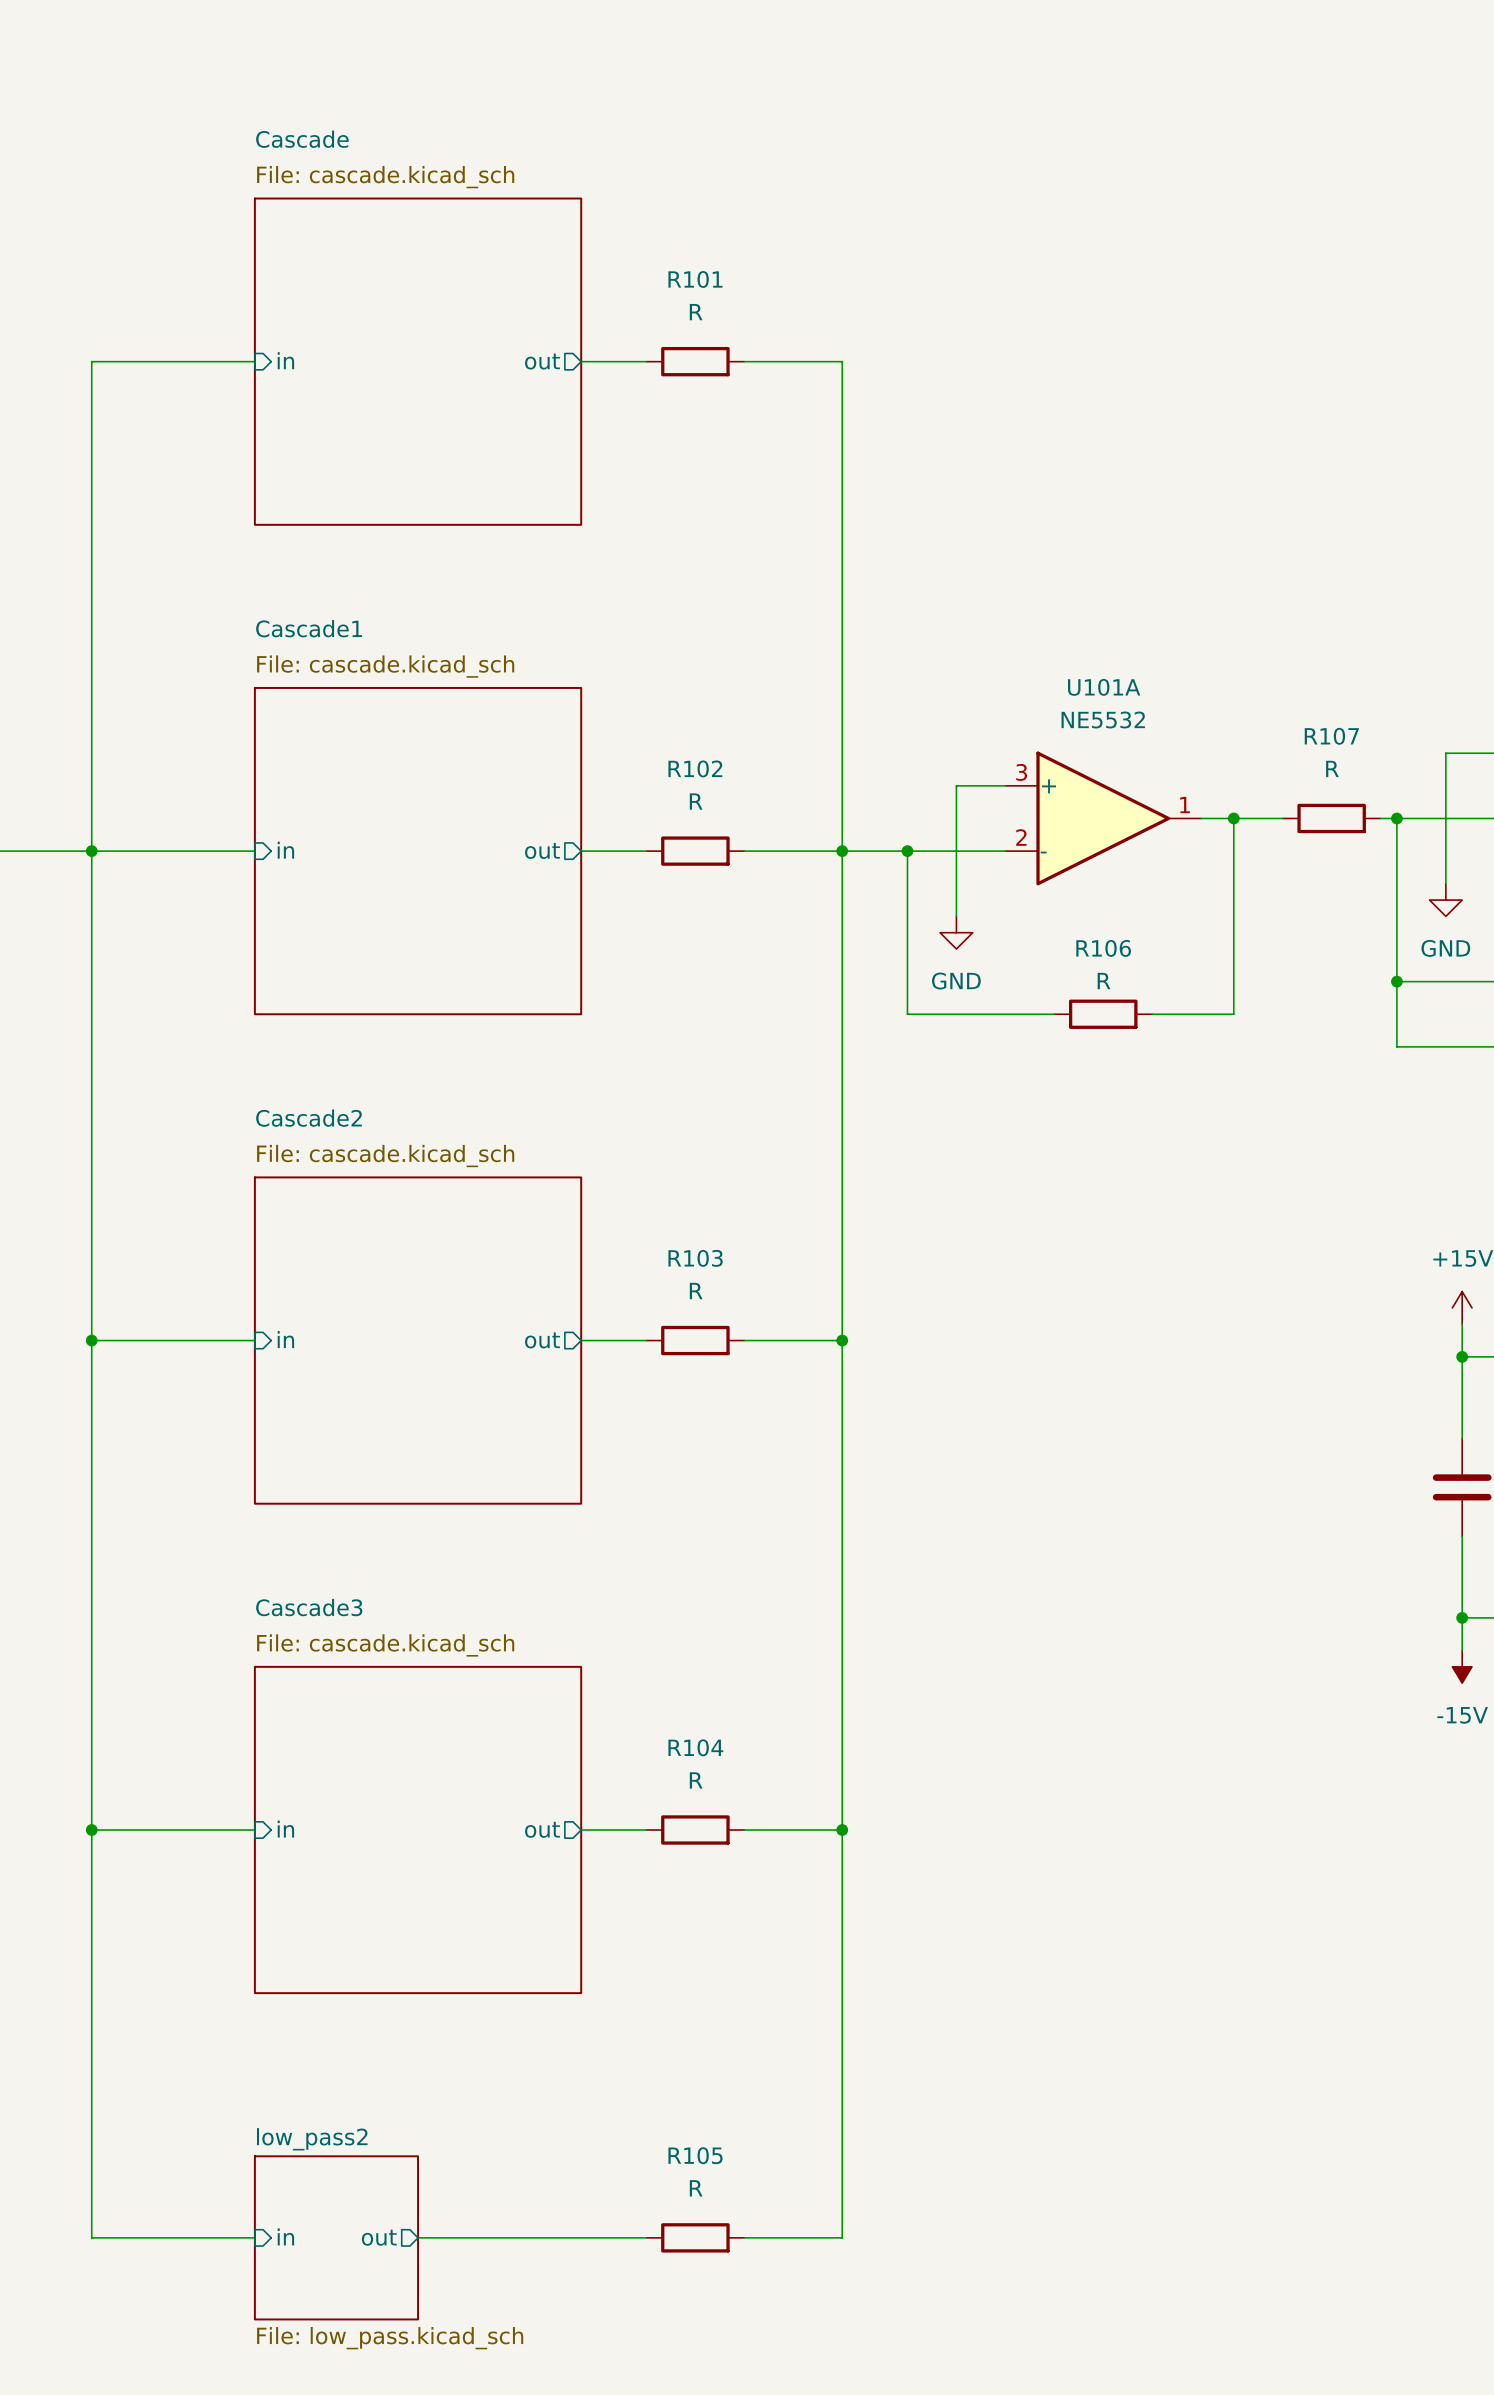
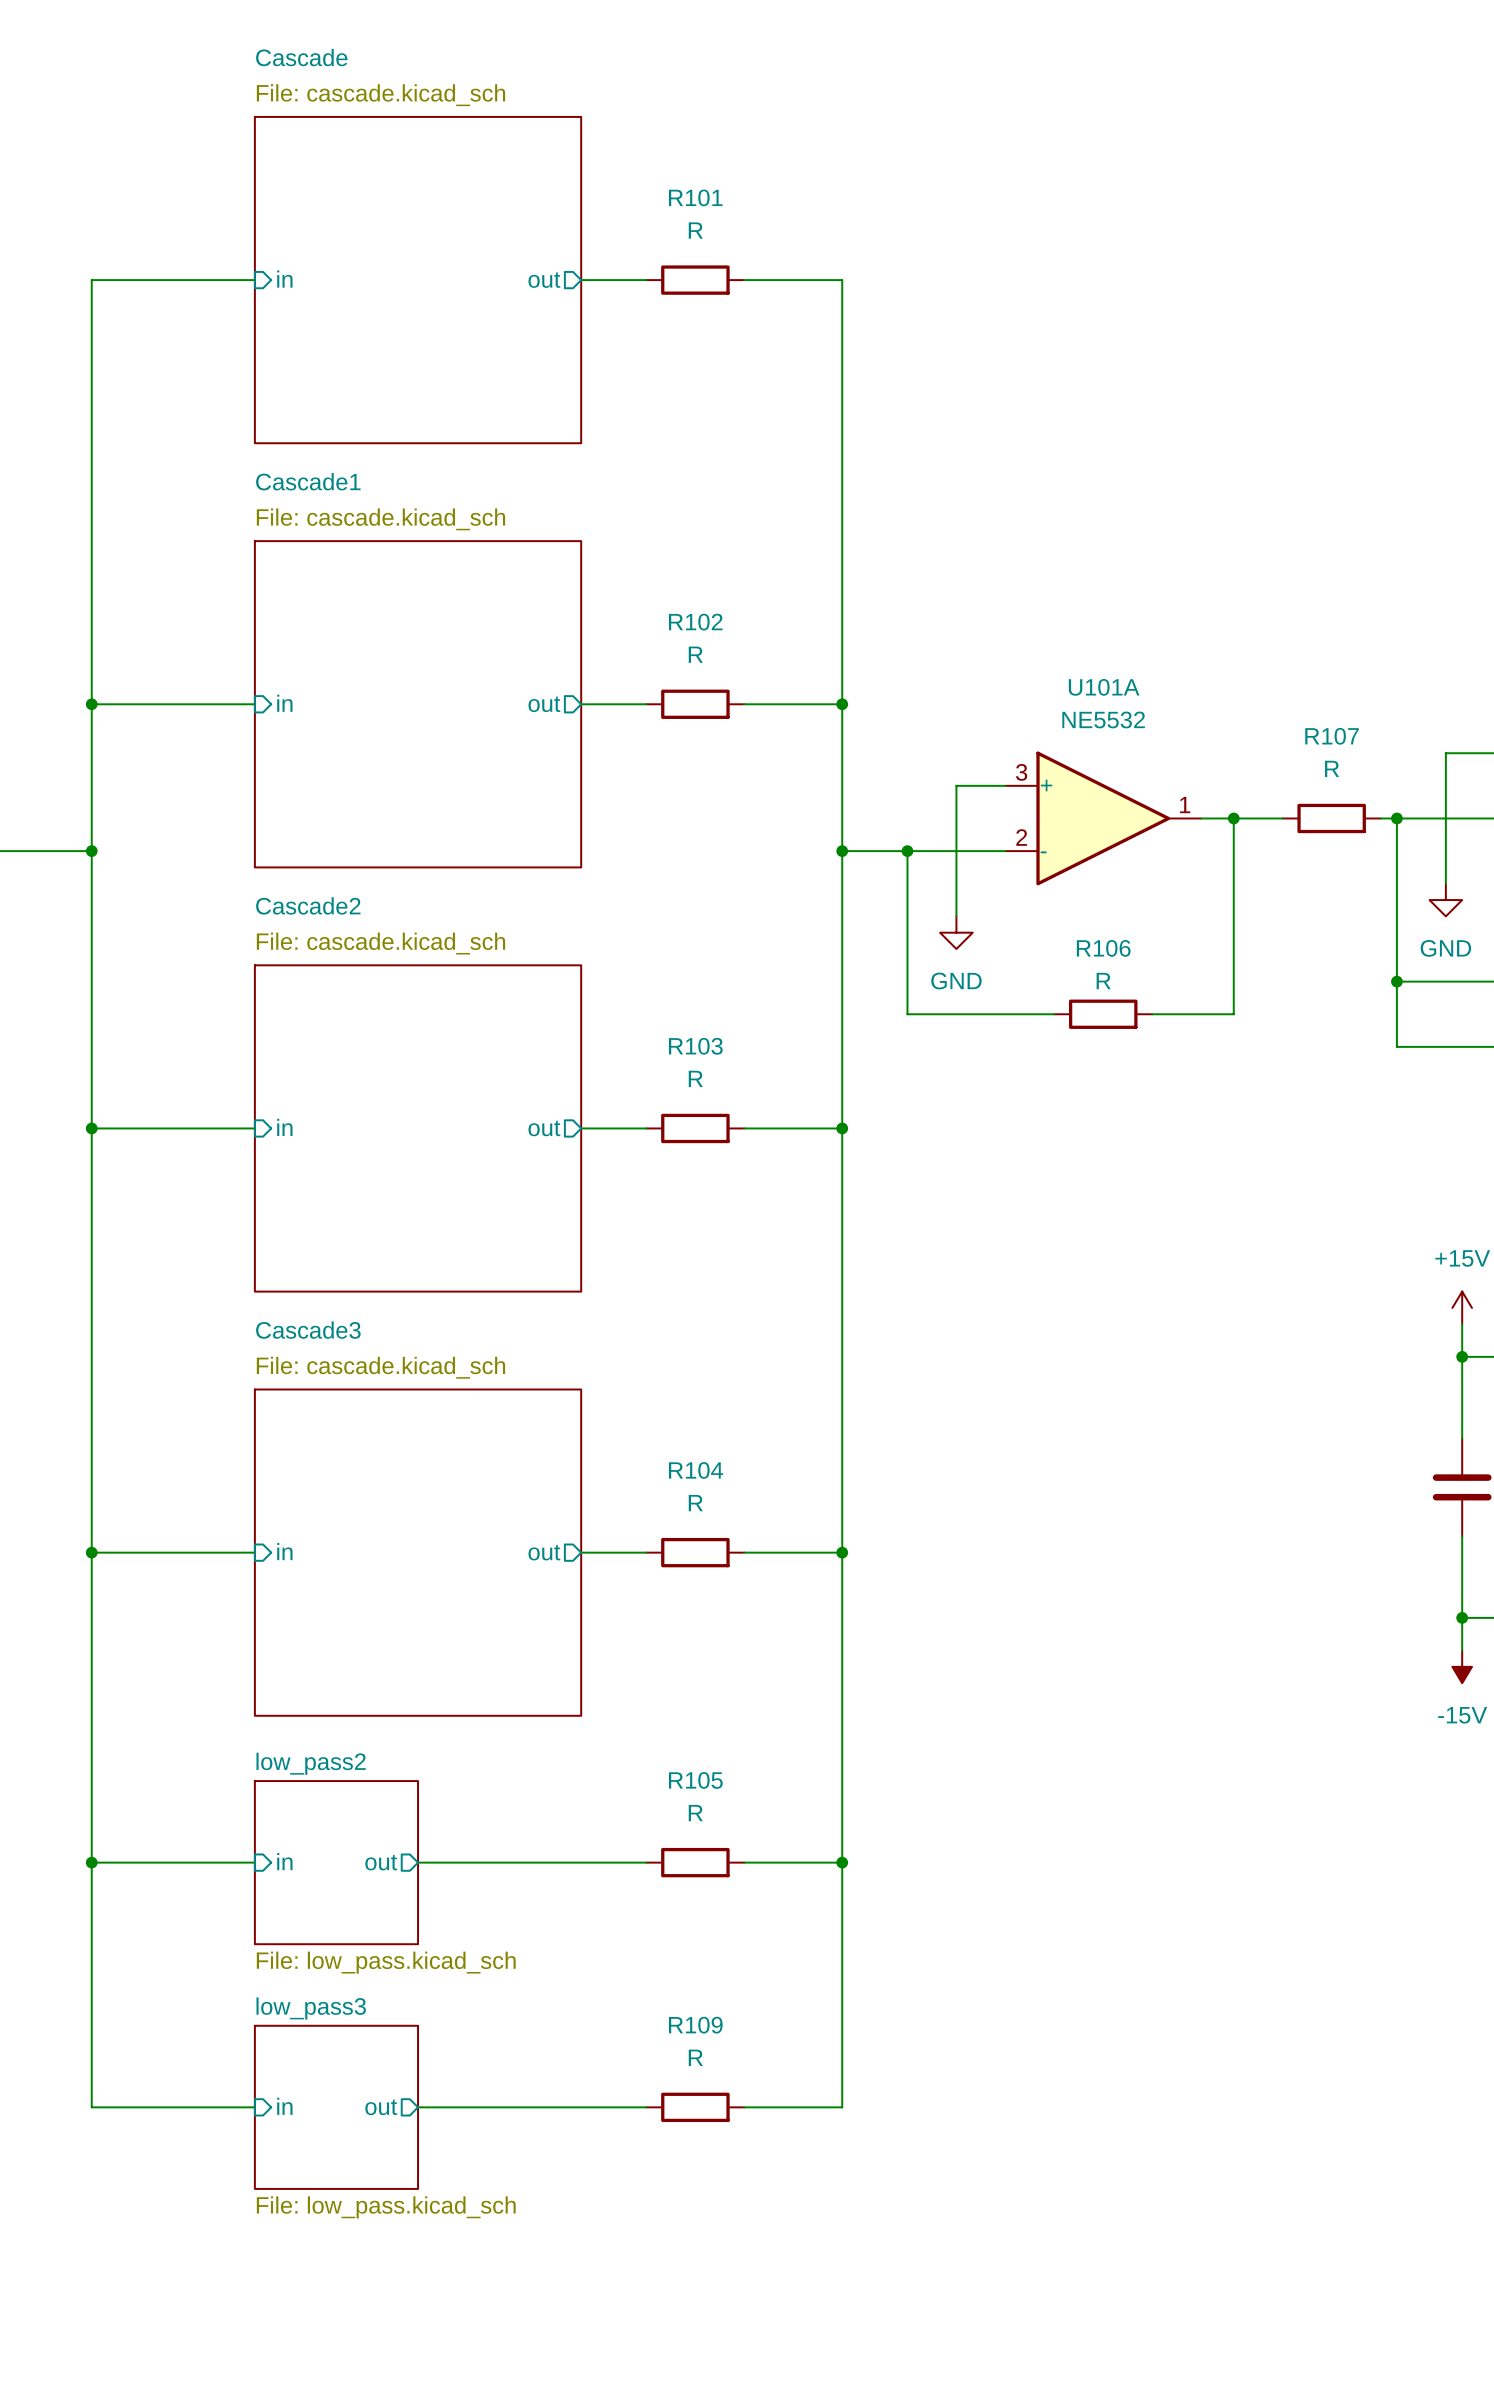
sheet pin position: in (285, 360) -> in (284, 279)
wire: (91, 361) (254, 361) -> (91, 361) (91, 280) (254, 280)
sheet Cascade position: (418, 361) -> (418, 280)
sheet pin position: out (542, 361) -> out (544, 280)
wire: (581, 361) (646, 361) -> (581, 280) (646, 280)
R101 position: (695, 361) -> (695, 280)
wire: (744, 361) (842, 361) -> (744, 280) (842, 280) (842, 361)
sheet pin: none -> in (284, 703)
wire: none -> (91, 704) (254, 704)
junction: none -> (91, 704)
sheet pin: none -> out (544, 704)
wire: none -> (581, 704) (646, 704)
wire: none -> (744, 704) (842, 704)
junction: none -> (842, 704)
sheet pin: in (285, 850) -> none
sheet pin: out (542, 850) -> none
wire: (91, 851) (254, 851) -> (91, 1128) (254, 1128)
sheet Cascade1 position: (418, 851) -> (418, 704)
wire: (581, 851) (646, 851) -> (581, 1128) (646, 1128)
R102 position: (695, 851) -> (695, 704)
wire: (744, 851) (842, 851) -> (744, 1128) (842, 1128)
sheet pin: none -> in (284, 1127)
junction: none -> (91, 1128)
sheet pin: none -> out (544, 1128)
junction: none -> (842, 1128)
sheet pin: in (285, 1339) -> none
wire: (91, 1340) (254, 1340) -> (91, 1552) (254, 1552)
junction: (91, 1340) -> none
sheet Cascade2 position: (418, 1340) -> (418, 1128)
sheet pin: out (542, 1340) -> none
wire: (581, 1340) (646, 1340) -> (581, 1552) (646, 1552)
R103 position: (695, 1340) -> (695, 1128)
wire: (744, 1340) (842, 1340) -> (744, 1552) (842, 1552)
junction: (842, 1340) -> none
sheet pin: none -> in (284, 1551)
junction: none -> (91, 1552)
sheet pin: none -> out (544, 1552)
junction: none -> (842, 1552)
sheet pin position: in (285, 1829) -> in (284, 1861)
sheet pin: out (542, 1829) -> none
wire: (91, 1830) (254, 1830) -> (91, 1862) (254, 1862)
junction position: (91, 1830) -> (91, 1862)
sheet Cascade3 position: (418, 1830) -> (418, 1552)
wire: (581, 1830) (646, 1830) -> none
R104 position: (695, 1830) -> (695, 1552)
wire: (744, 1830) (842, 1830) -> (744, 1862) (842, 1862)
junction position: (842, 1830) -> (842, 1862)
sheet pin: none -> out (381, 1862)
wire: none -> (418, 1862) (646, 1862)
wire: (91, 2107) (91, 2237) (254, 2237) -> (91, 2107) (254, 2107)
sheet low_pass3: none -> File: low_pass.kicad_sch (336, 2107)
R109: none -> R (695, 2107)
wire: (842, 2107) (842, 2237) (744, 2237) -> (842, 2107) (744, 2107)
sheet pin position: in (285, 2236) -> in (284, 2106)
sheet low_pass2 position: (336, 2237) -> (336, 1862)
sheet pin position: out (379, 2237) -> out (381, 2107)
wire: (418, 2237) (646, 2237) -> (418, 2107) (646, 2107)
R105 position: (695, 2237) -> (695, 1862)

